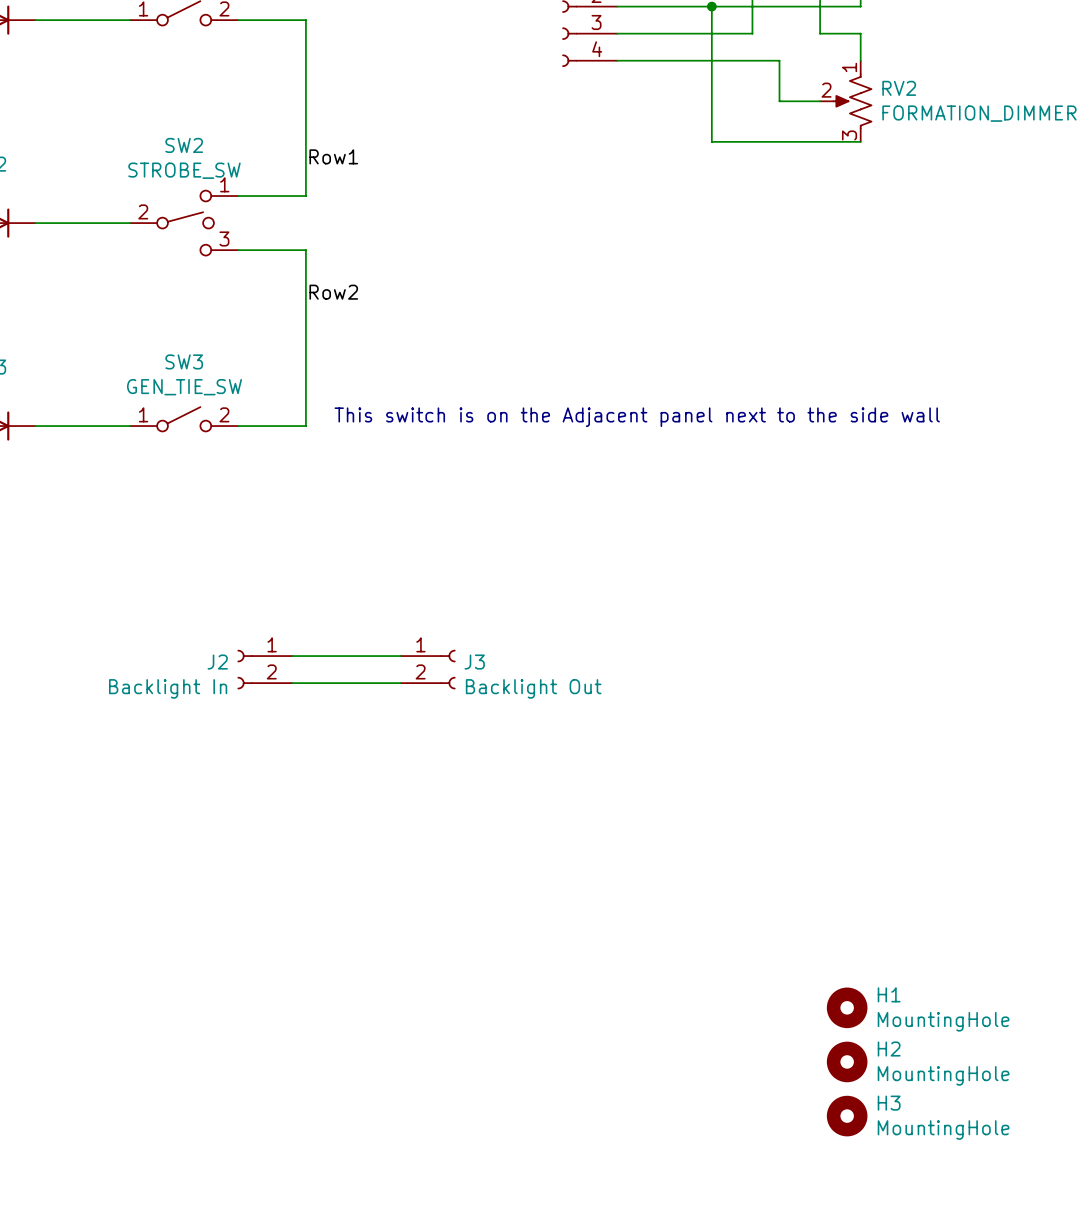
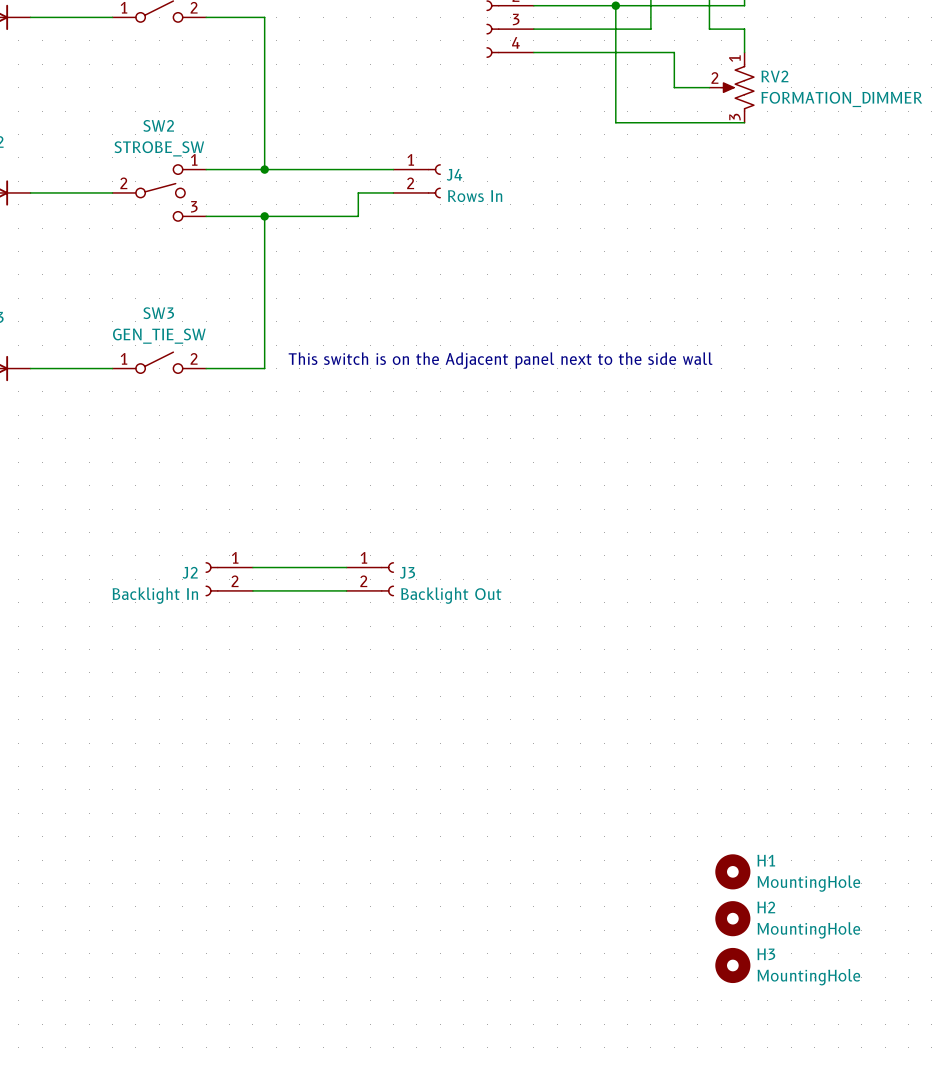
label: Row1 (333, 156) -> none
wire: none -> (264, 169) (393, 169)
junction: none -> (264, 169)
J4: none -> Rows In (417, 181)
wire: none -> (393, 192) (358, 192) (358, 216) (264, 216)
junction: none -> (264, 216)
label: Row2 (333, 292) -> none

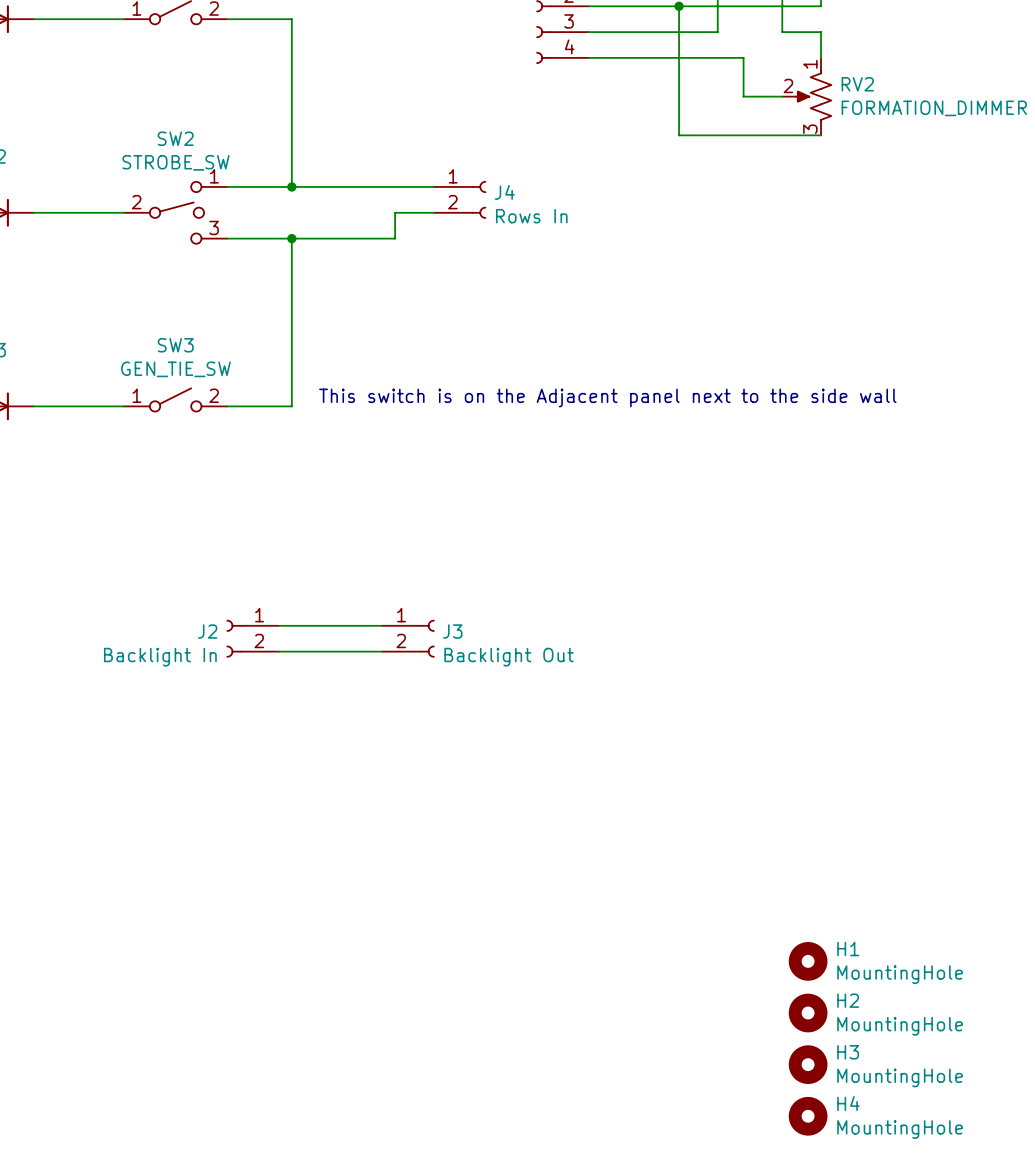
H4: none -> MountingHole (808, 1116)

